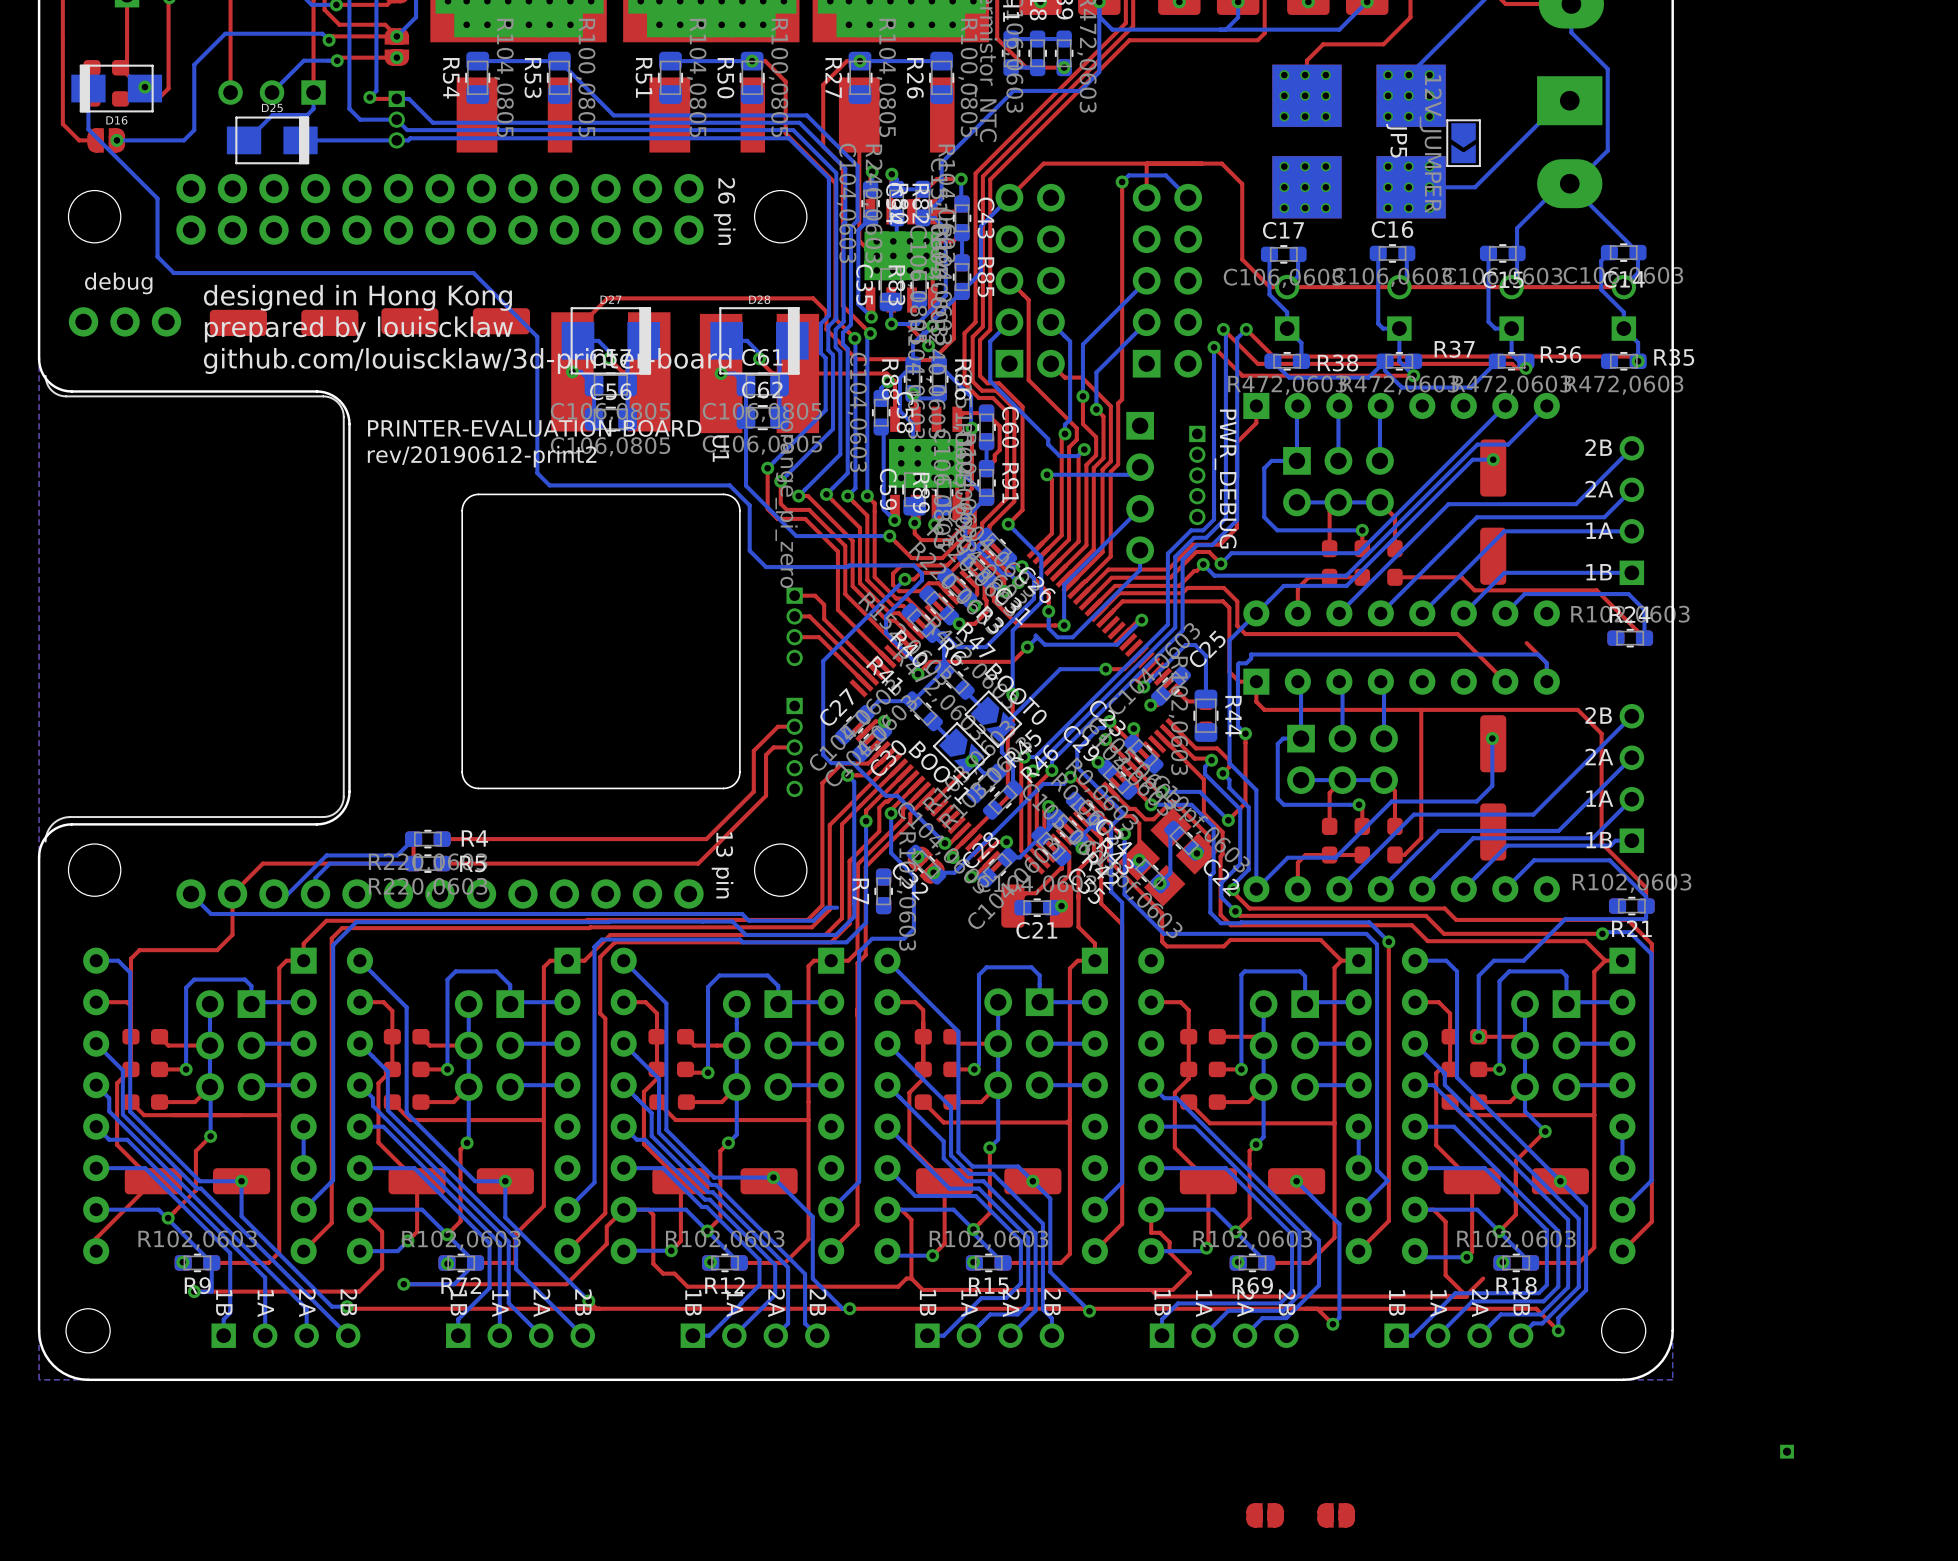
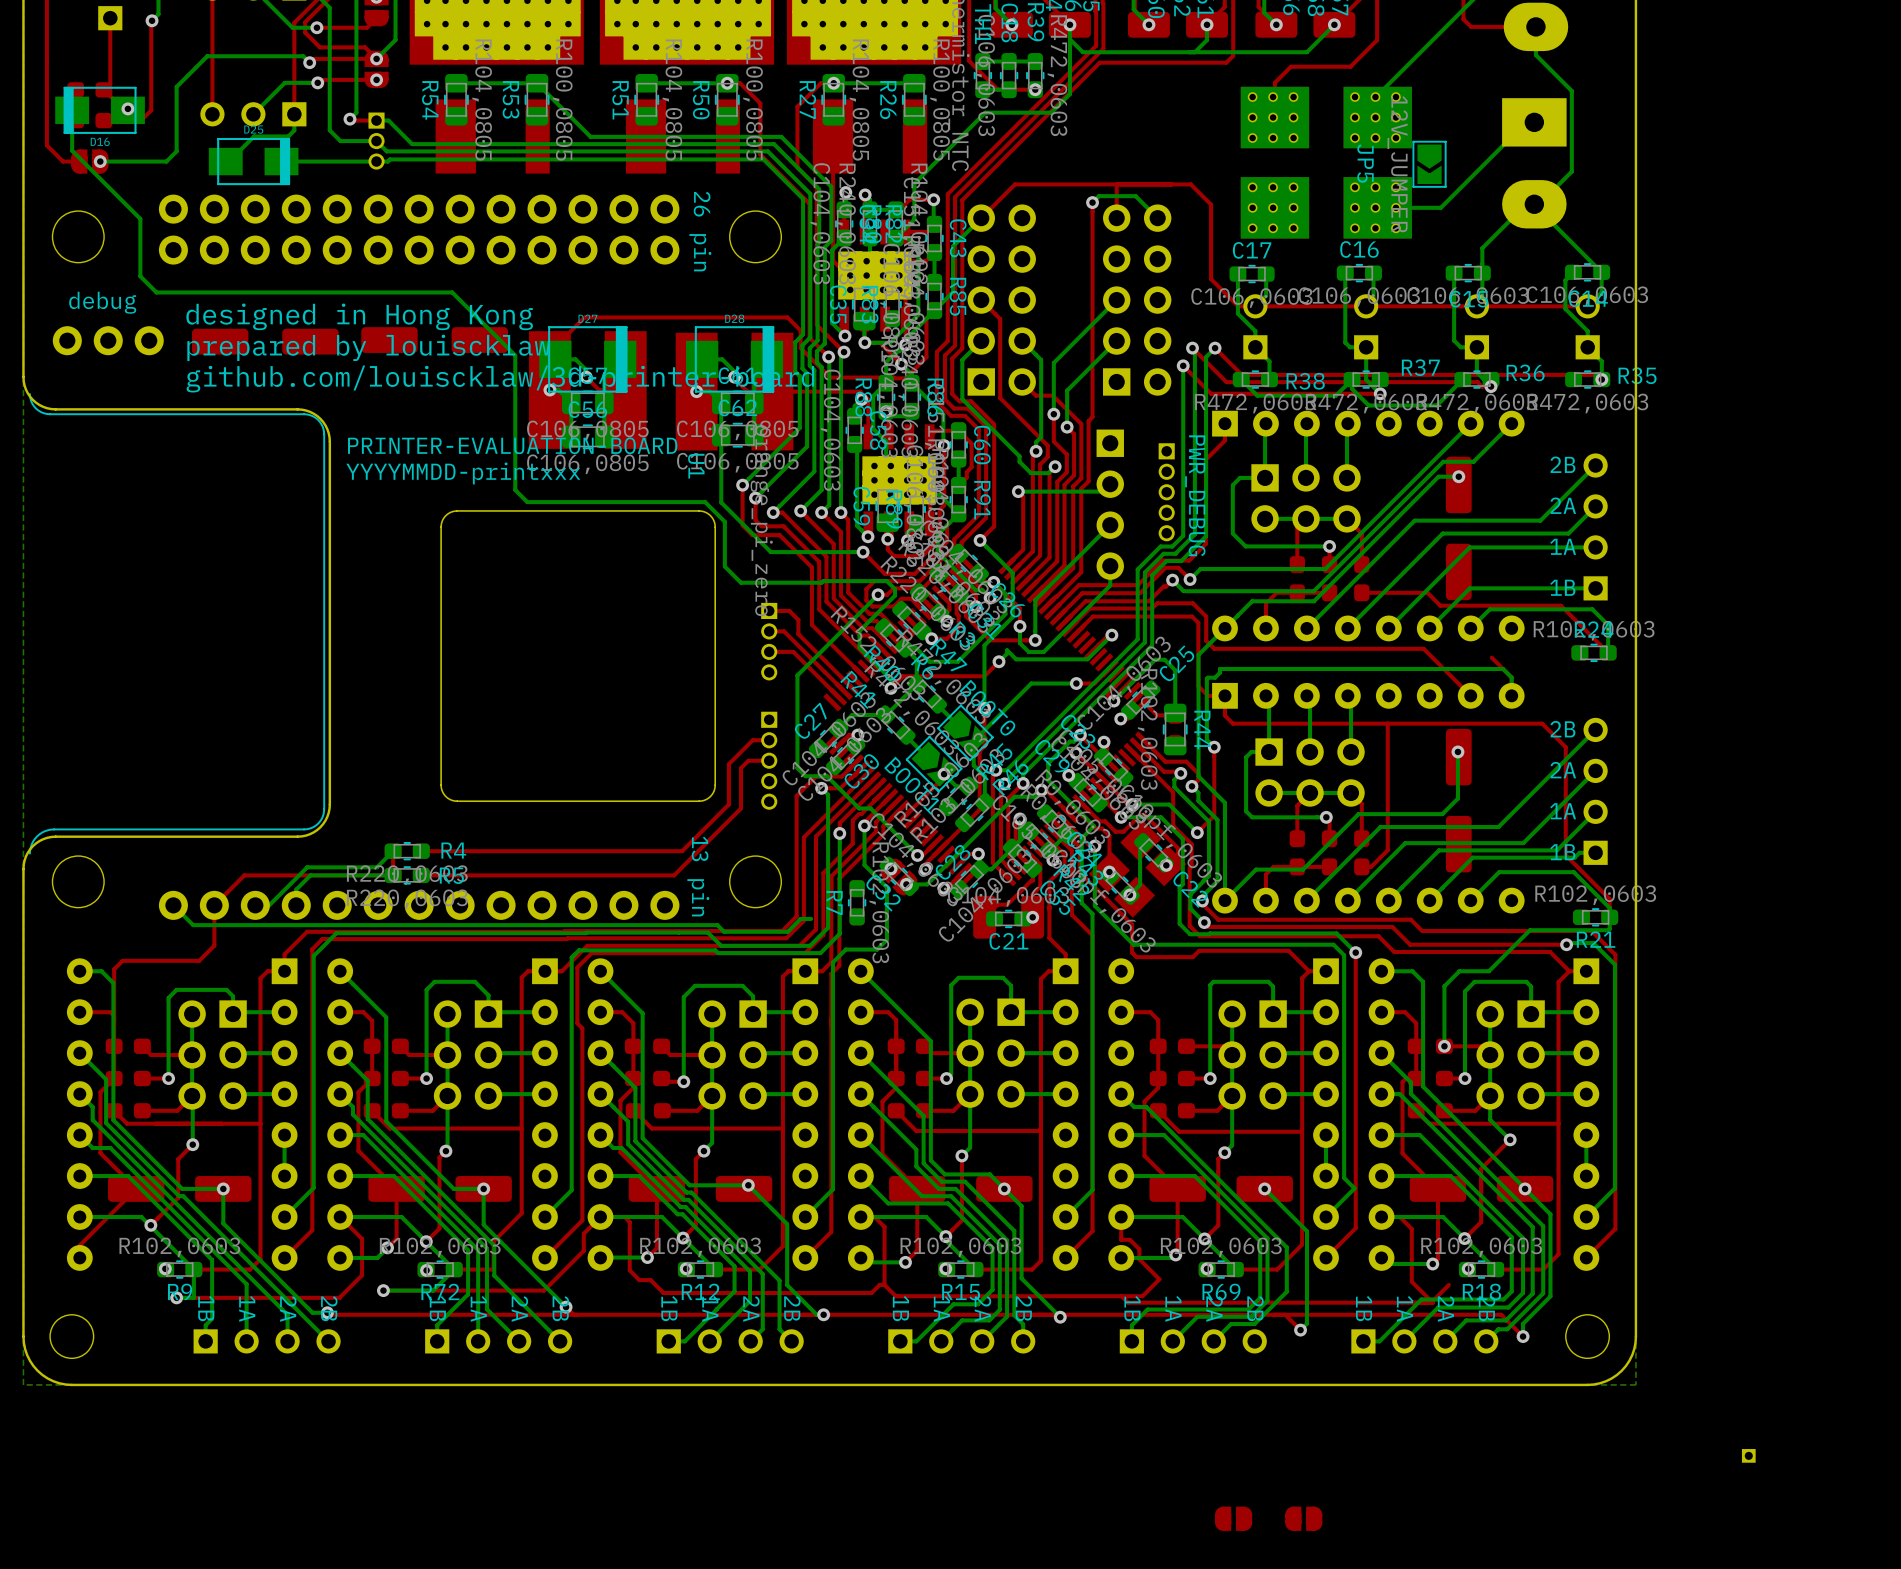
text: rev/20190612-print2 (482, 456) -> YYYYMMDD-printxxx (463, 473)

